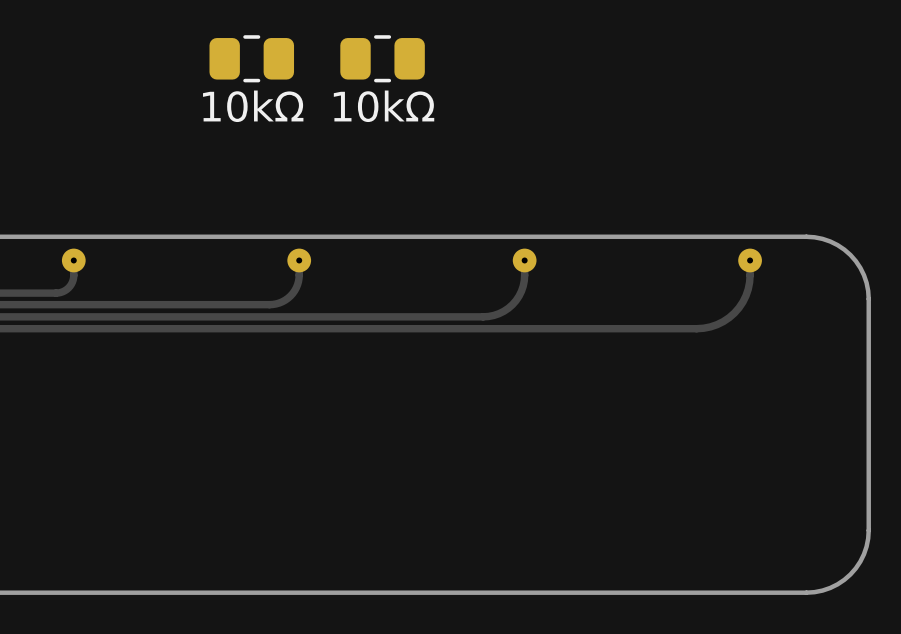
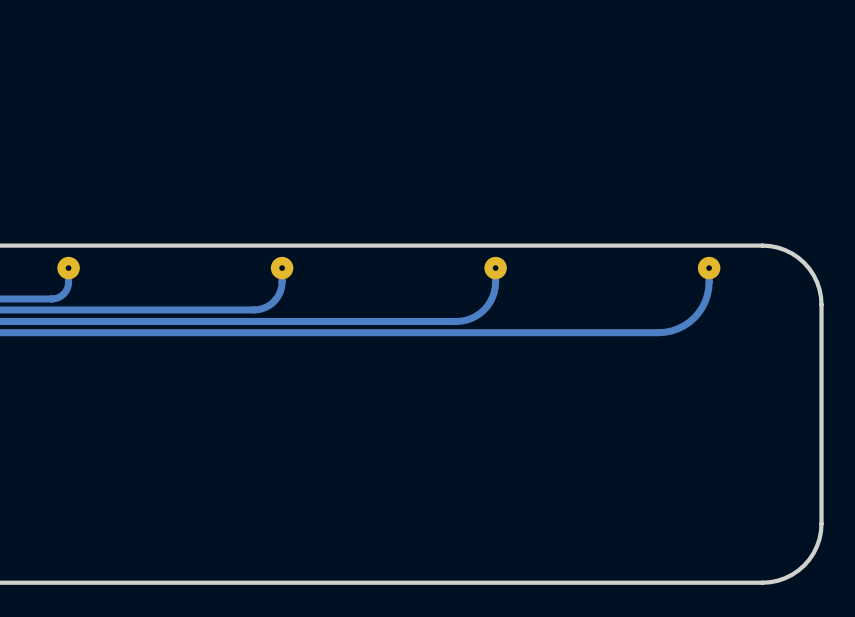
part: 10kΩ (251, 58) -> none
part: 10kΩ (382, 58) -> none

